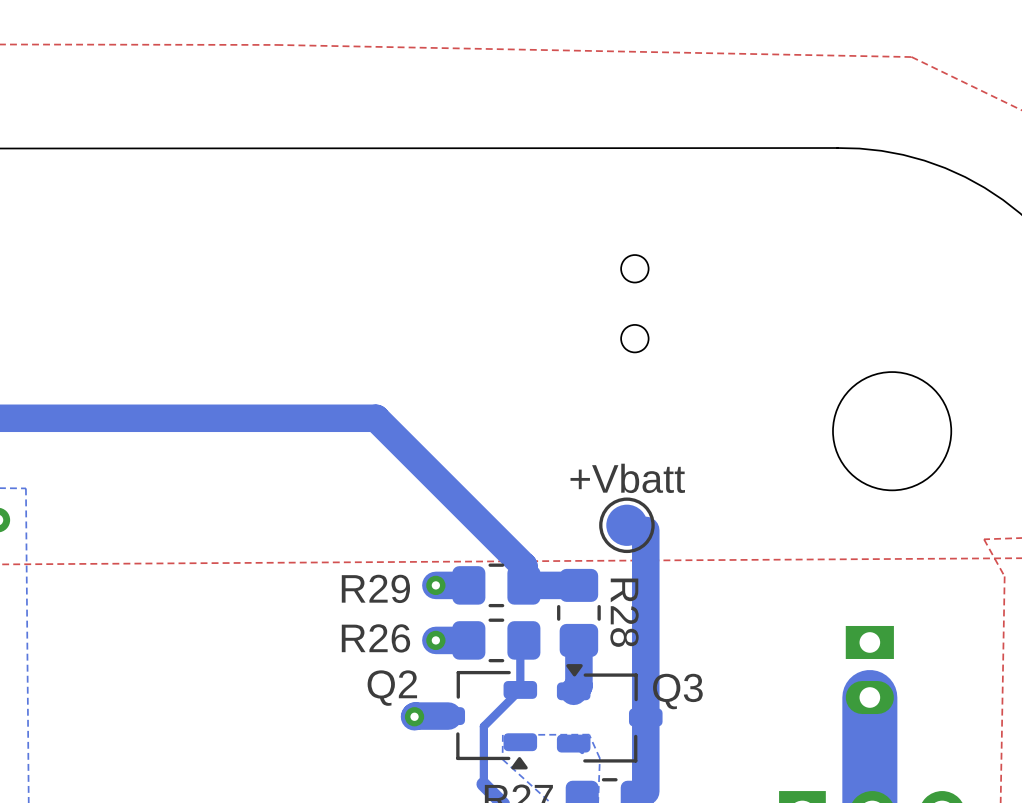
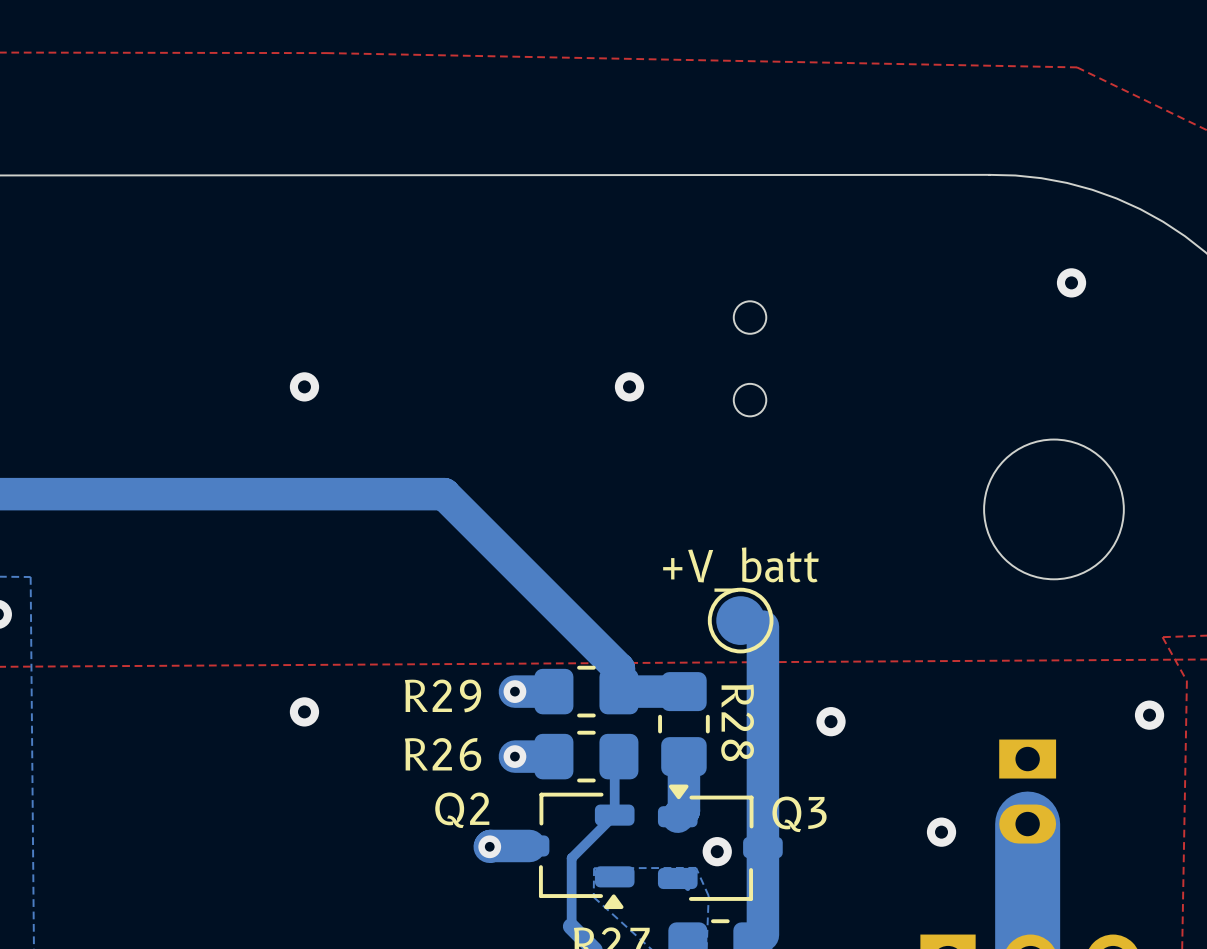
via: none -> (1071, 282)
via: none -> (304, 386)
via: none -> (629, 386)
+Vbatt name: +Vbatt (627, 478) -> +V_batt (740, 569)
via: none -> (304, 711)
via: none -> (1149, 715)
via: none -> (831, 721)
via: none -> (941, 832)
via: none -> (717, 851)

